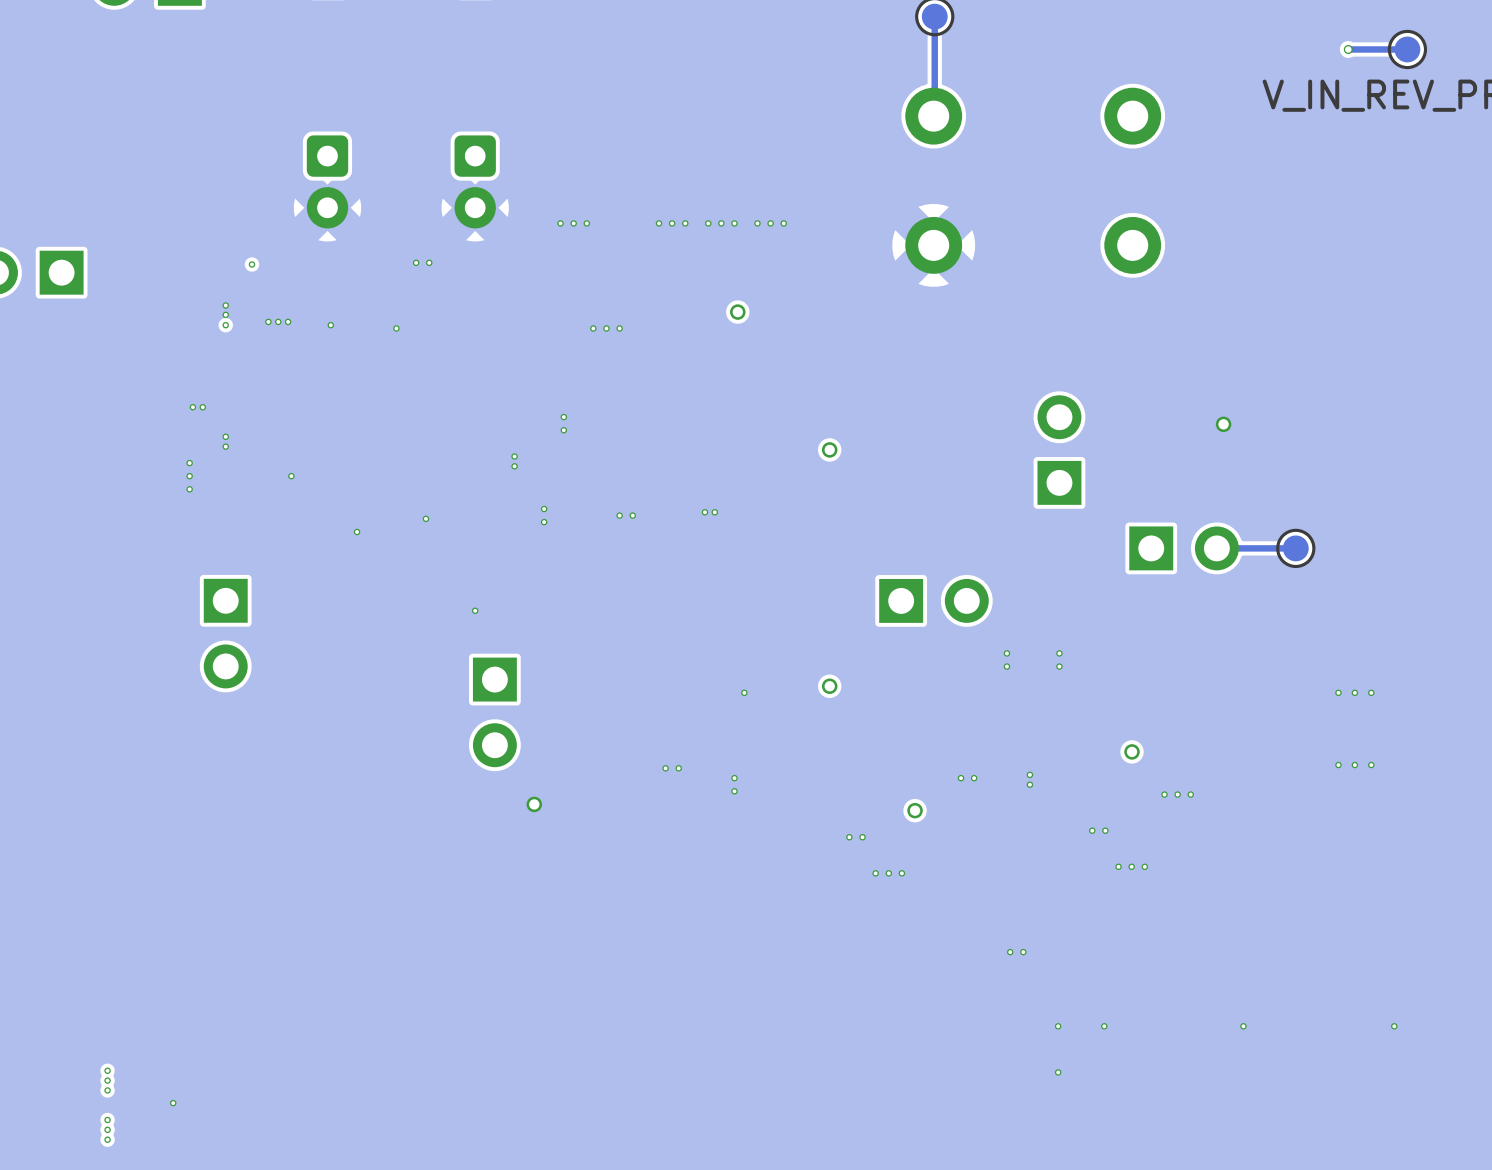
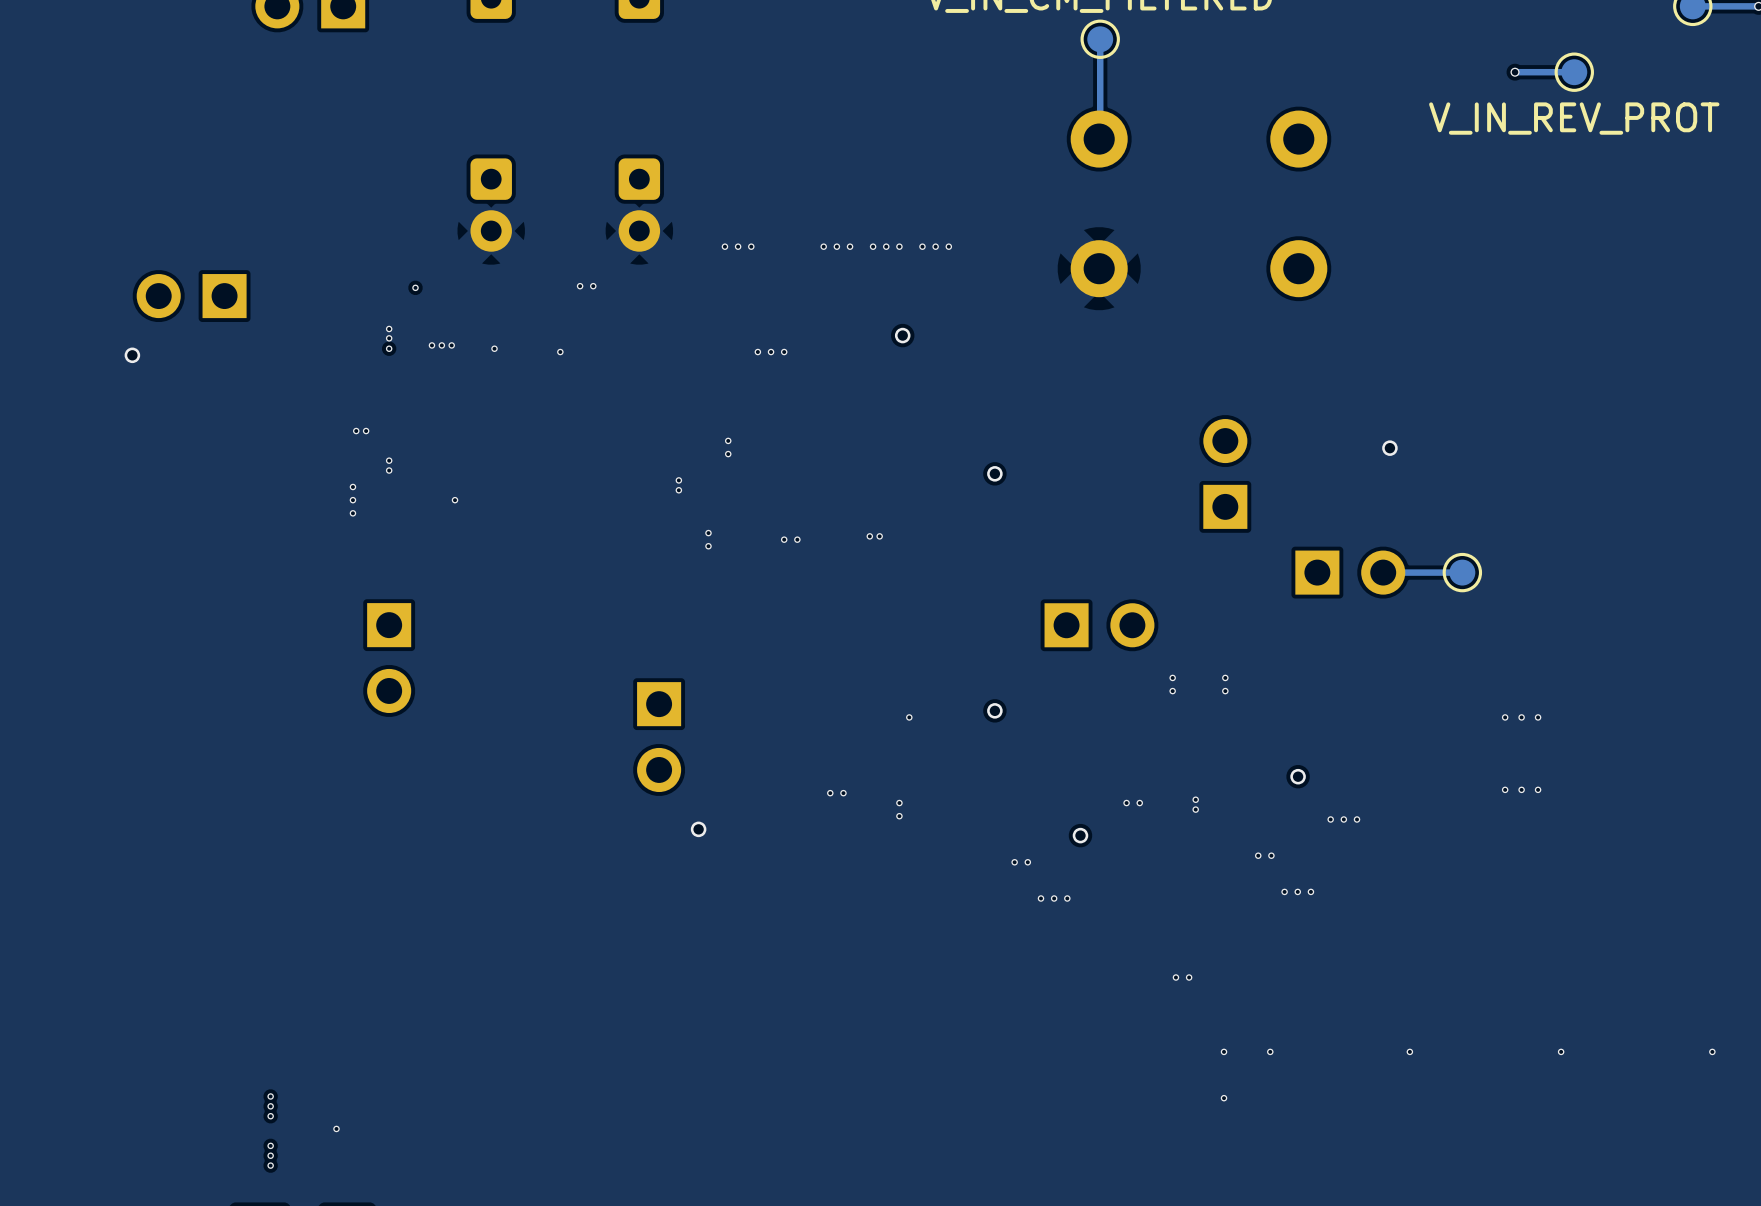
via: (425, 518) -> none
via: (357, 531) -> none
via: (475, 610) -> none

